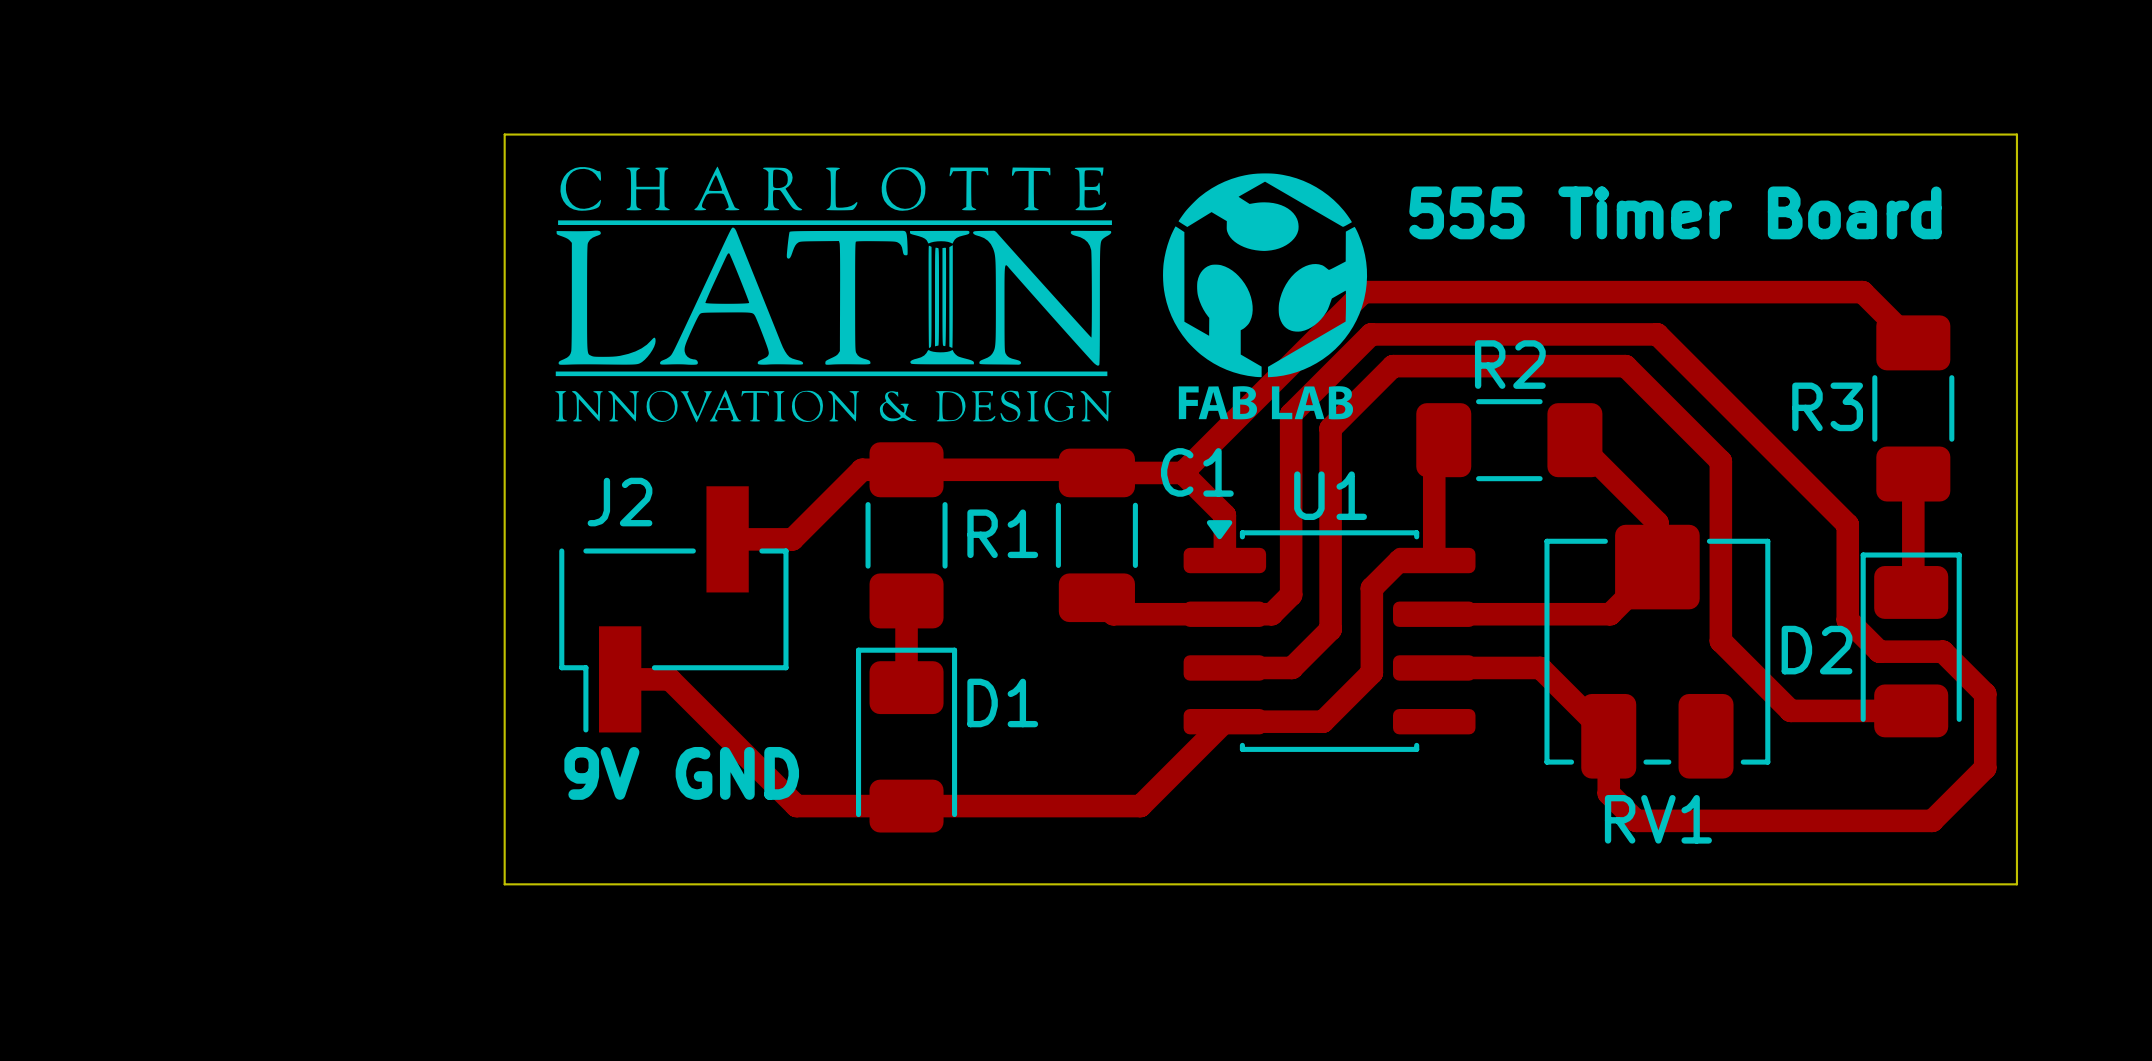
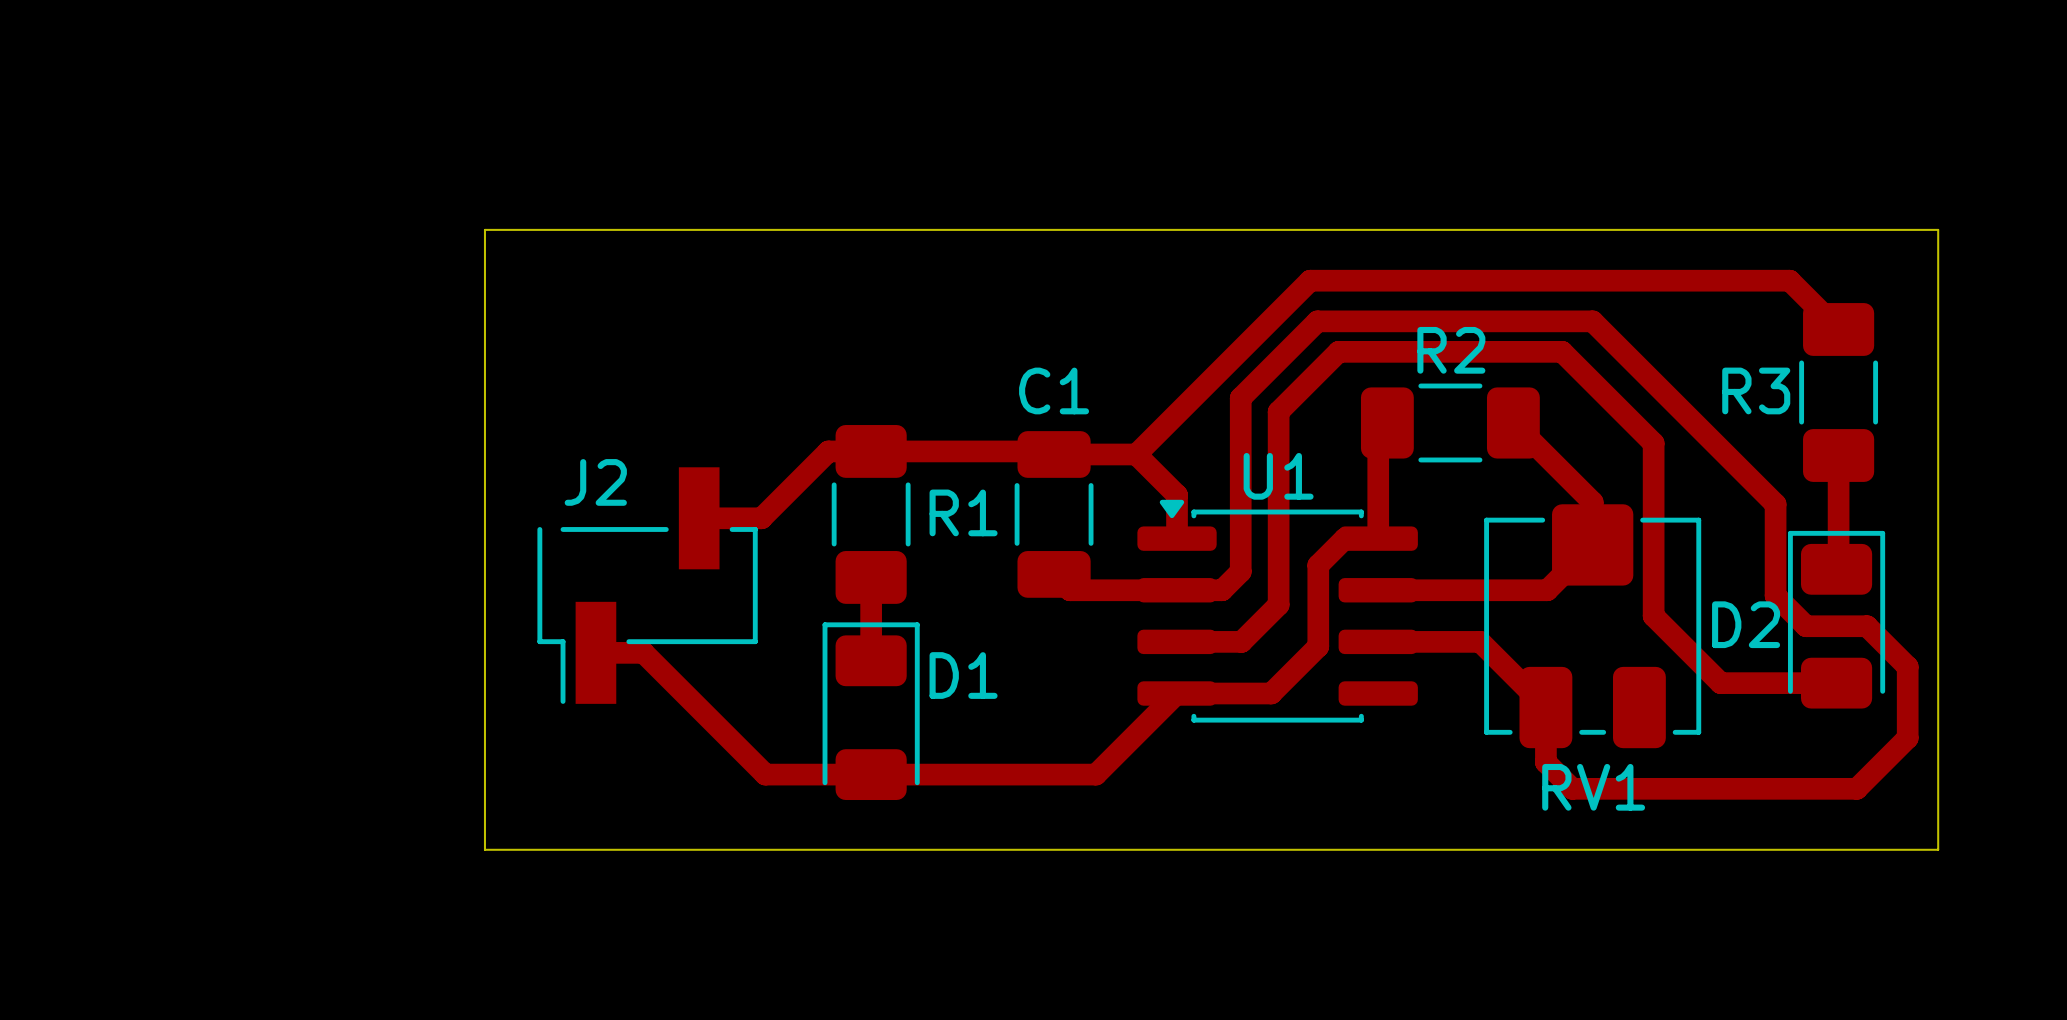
drawing: [555, 166, 1112, 423] -> none
drawing: [1163, 173, 1368, 420] -> none
text: 555 Timer Board (1675, 212) -> none
board edge: (504, 239) (504, 134) (2016, 134) (2016, 239) -> (484, 229) (1938, 229)
C1 name position: C1 (1197, 472) -> C1 (1054, 390)
text: 9V (601, 773) -> none
text: GND (737, 773) -> none

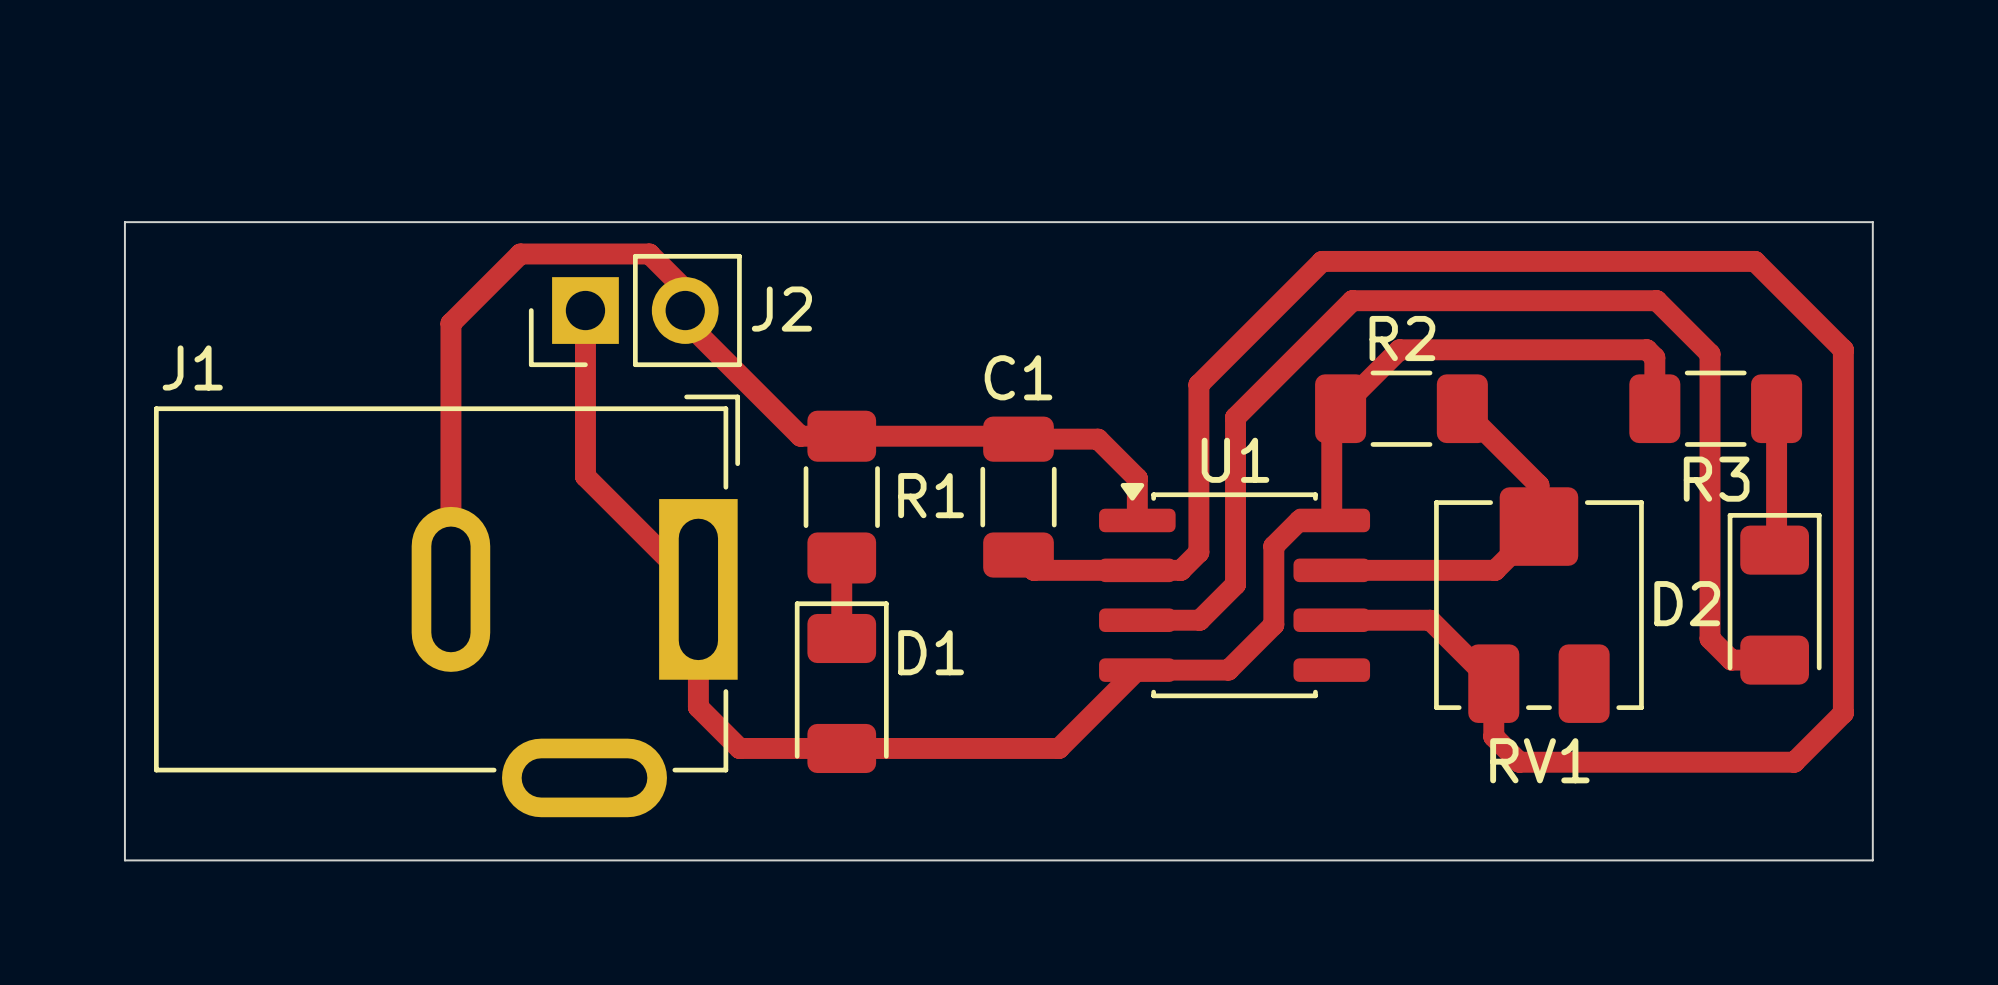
board edge: (484, 229) (484, 849) (1938, 849) -> (468, 222) (124, 222) (124, 860) (1872, 860) (1872, 821)
track: (1317, 321) (1592, 321) (1775, 504) (1775, 595) (1806, 626) (1867, 626) (1907, 666) -> (1273, 310) (1322, 261) (1754, 261) (1843, 349) (1843, 644)
track: (1838, 329) (1789, 280) (1310, 280) (1136, 454) -> none
R3 name position: R3 (1756, 390) -> R3 (1716, 479)
R3 rotation: 0° (1838, 392) -> 90° clockwise (1715, 408)
track: none -> (1340, 408) (1399, 349) (1646, 349) (1654, 357) (1654, 408)
track: (1278, 432) (1278, 411) (1338, 351) (1562, 351) (1653, 443) (1653, 616) (1720, 683) (1791, 683) -> (1235, 417) (1352, 300) (1656, 300) (1710, 353) (1710, 638) (1731, 660)
track: (828, 451) (761, 518) (699, 518) -> (800, 436) (685, 320) (685, 289) (649, 253) (520, 253) (450, 323) (450, 589)
J2 footprint: [537, 467, 758, 704] -> [528, 253, 742, 368]
J2 name position: J2 (595, 482) -> J2 (781, 309)
J1: none -> (447, 605)
track: (595, 652) (643, 652) (722, 731) -> (585, 310) (585, 476) (698, 589) (698, 707)

